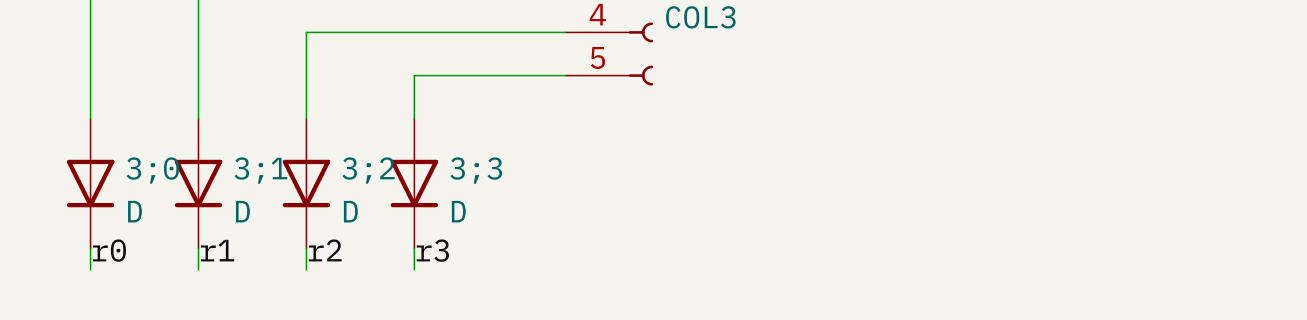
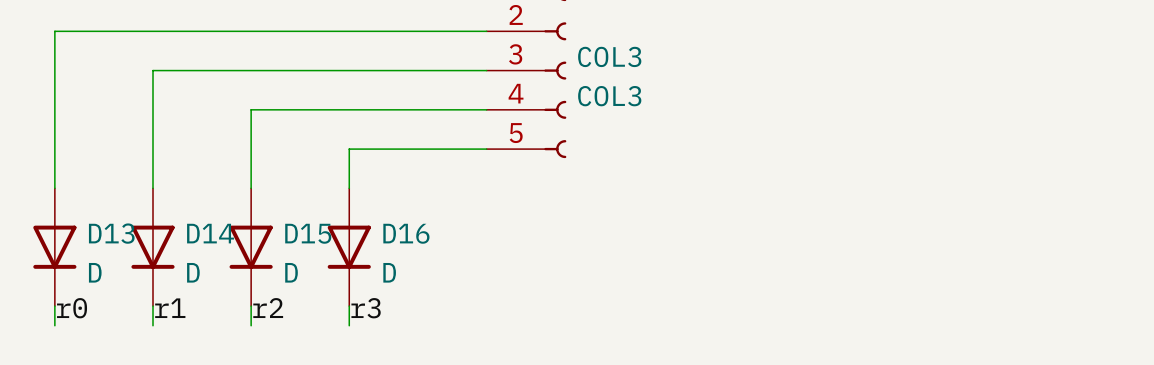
3;0 name: 3;0 (152, 170) -> D13 (111, 233)
3;1 name: 3;1 (260, 170) -> D14 (210, 233)
3;2 name: 3;2 (368, 170) -> D15 (308, 233)
3;3 name: 3;3 (476, 170) -> D16 (406, 233)

